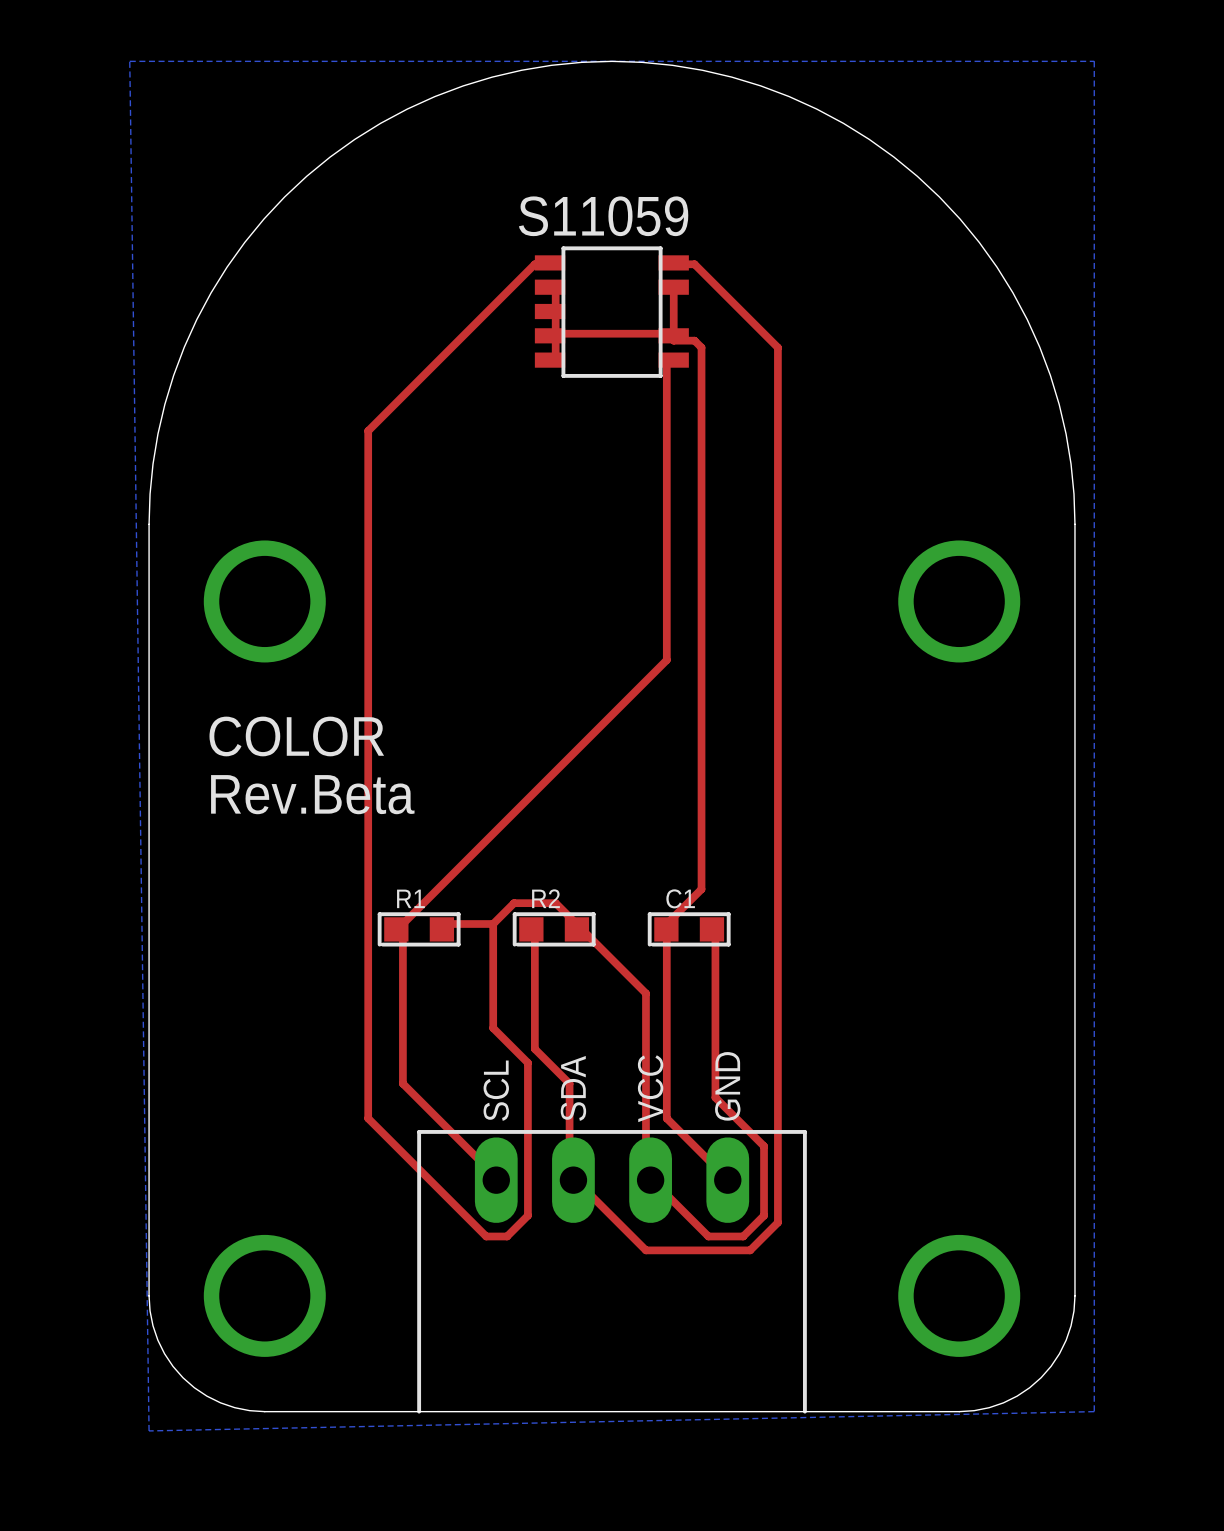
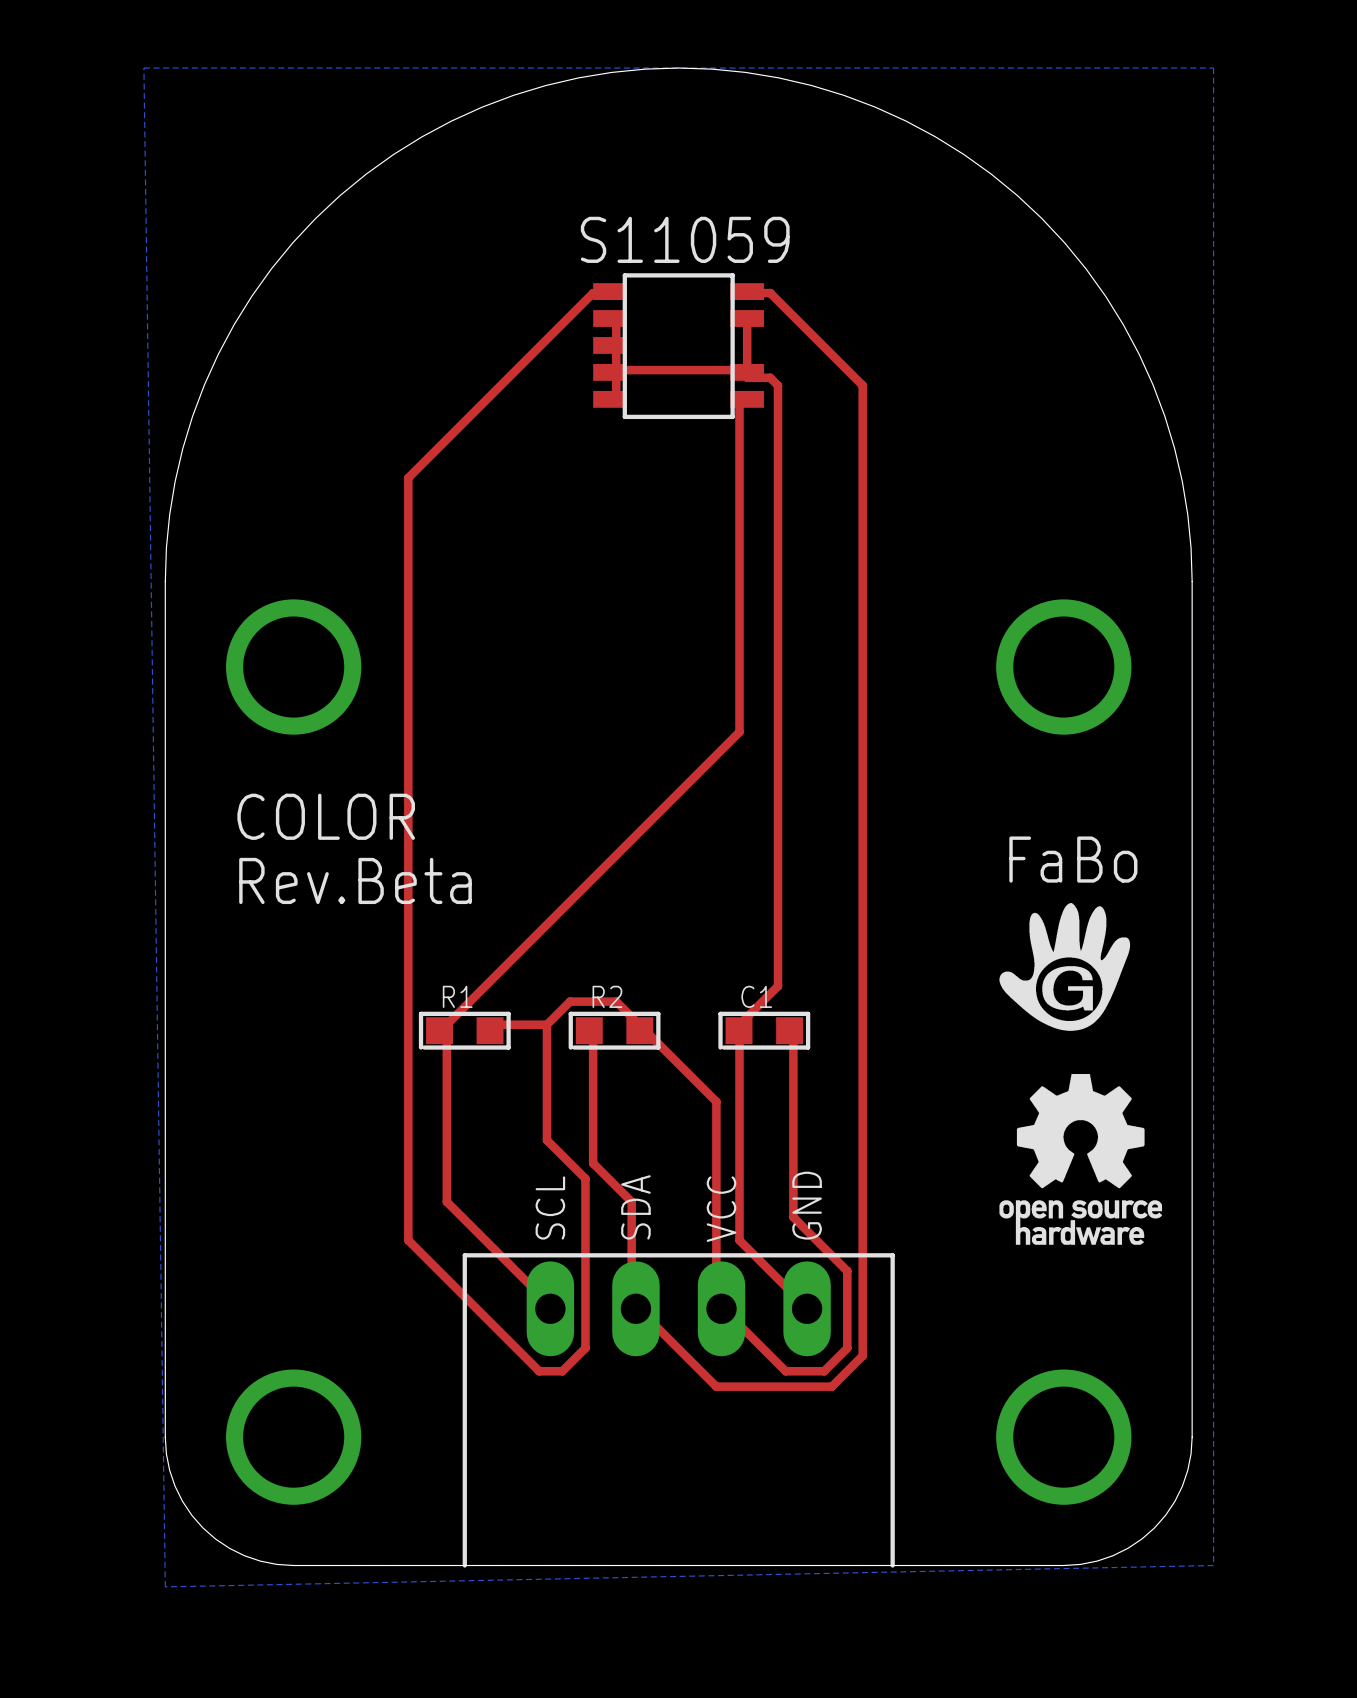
text: none -> FaBo (1073, 859)
drawing: none -> [999, 902, 1131, 1031]
drawing: none -> [999, 1073, 1163, 1245]

